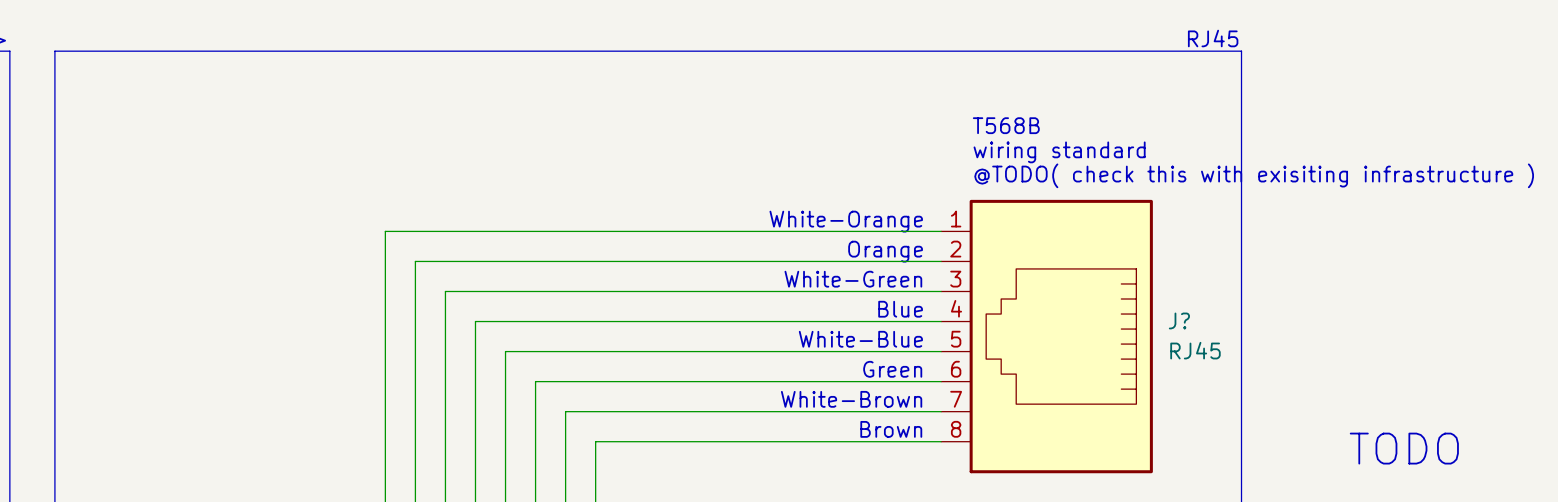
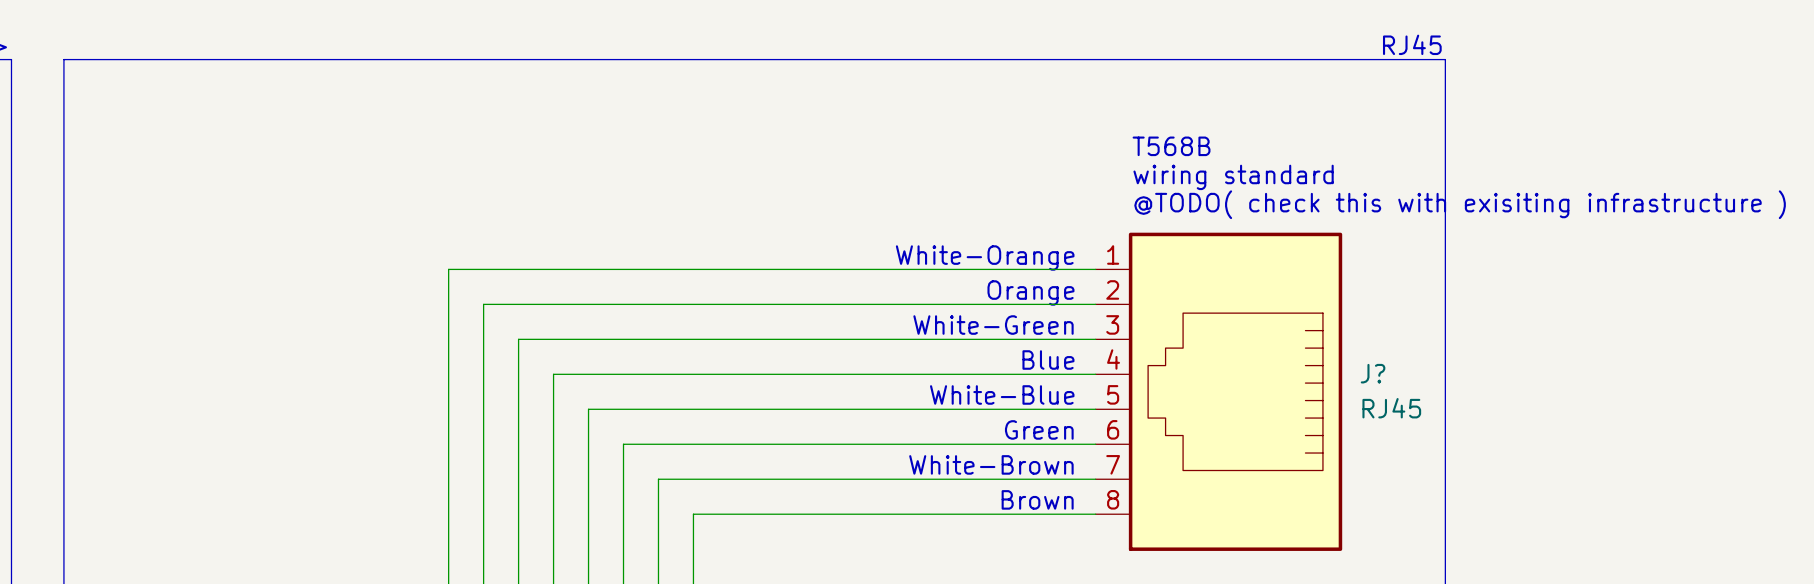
text: TODO (1404, 448) -> none

